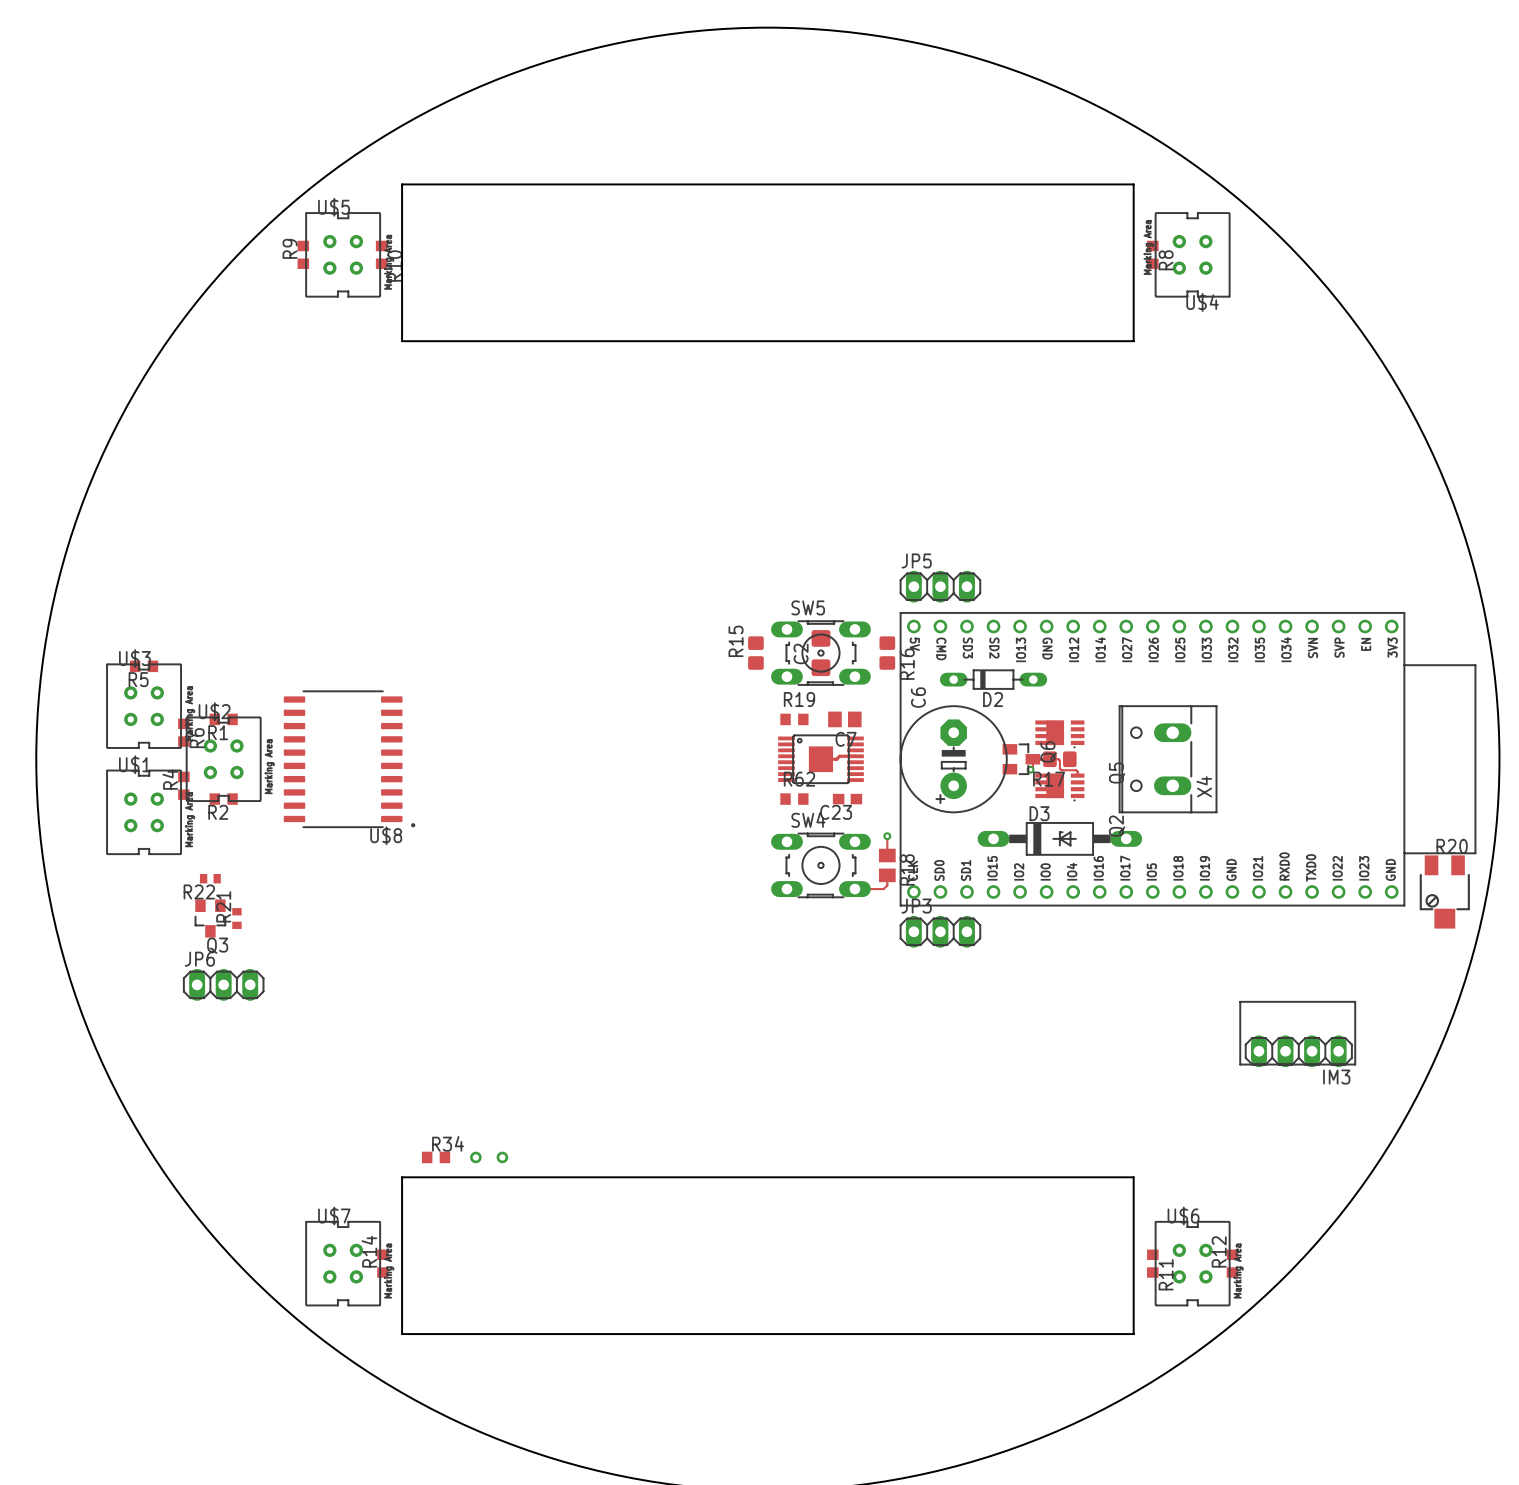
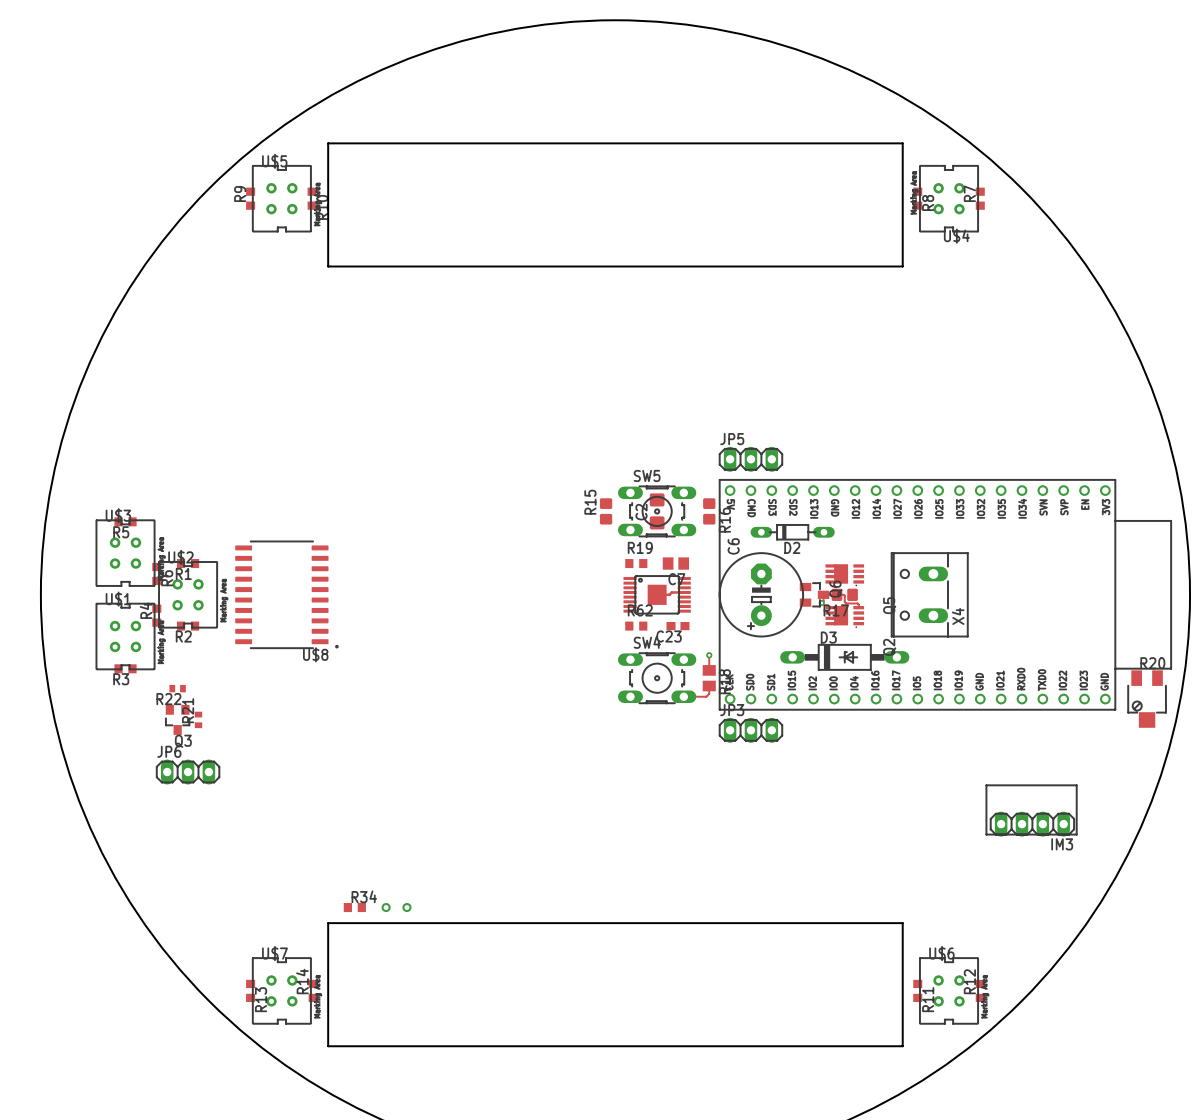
R7: none -> (980, 198)
R3: none -> (125, 668)
R13: none -> (250, 990)

